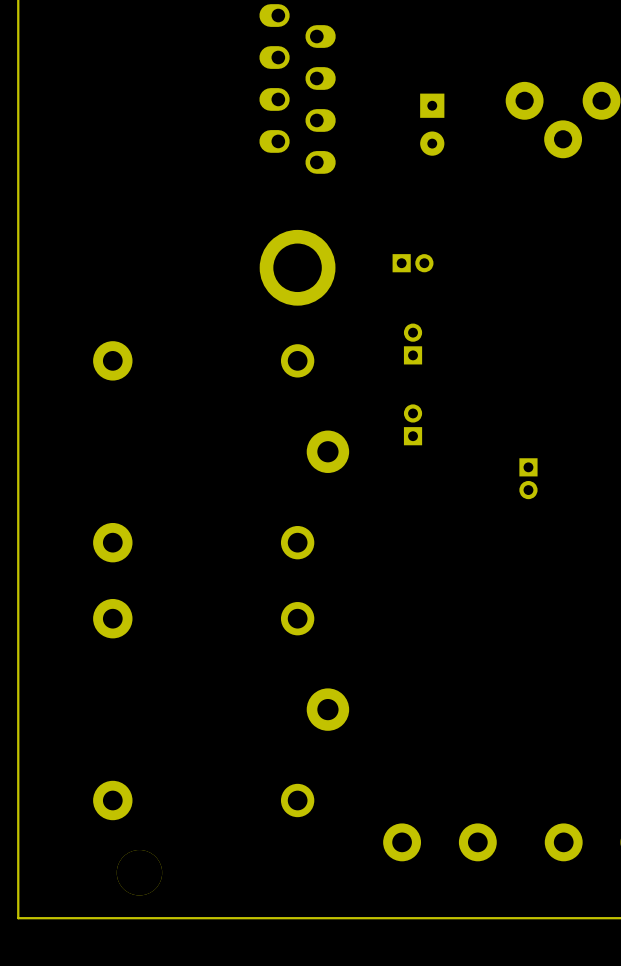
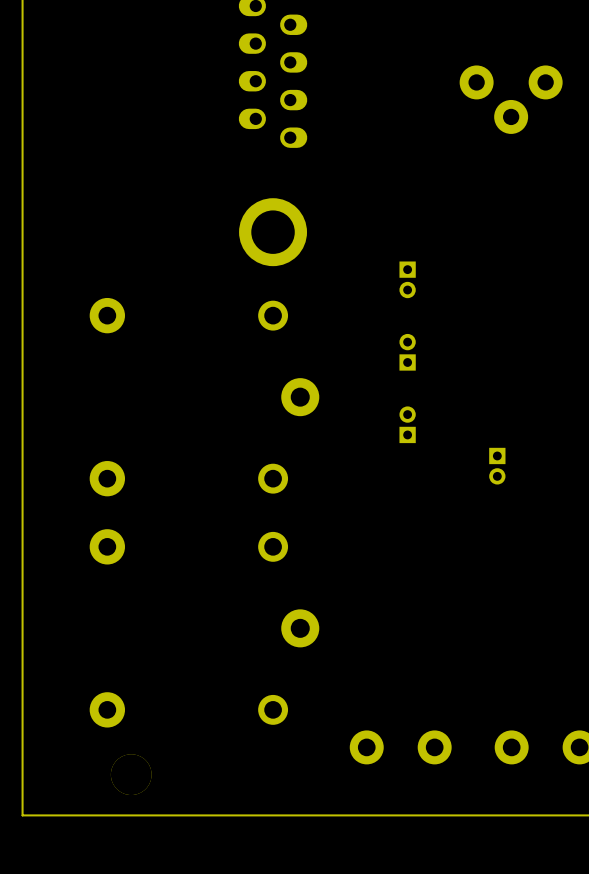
part: (432, 124) -> none
part: (413, 263) -> none
part: none -> (407, 279)
part: (413, 344) -> none
part: none -> (407, 352)
part: (413, 424) -> none
part: (528, 478) -> none
part: none -> (407, 424)
part: none -> (497, 466)

